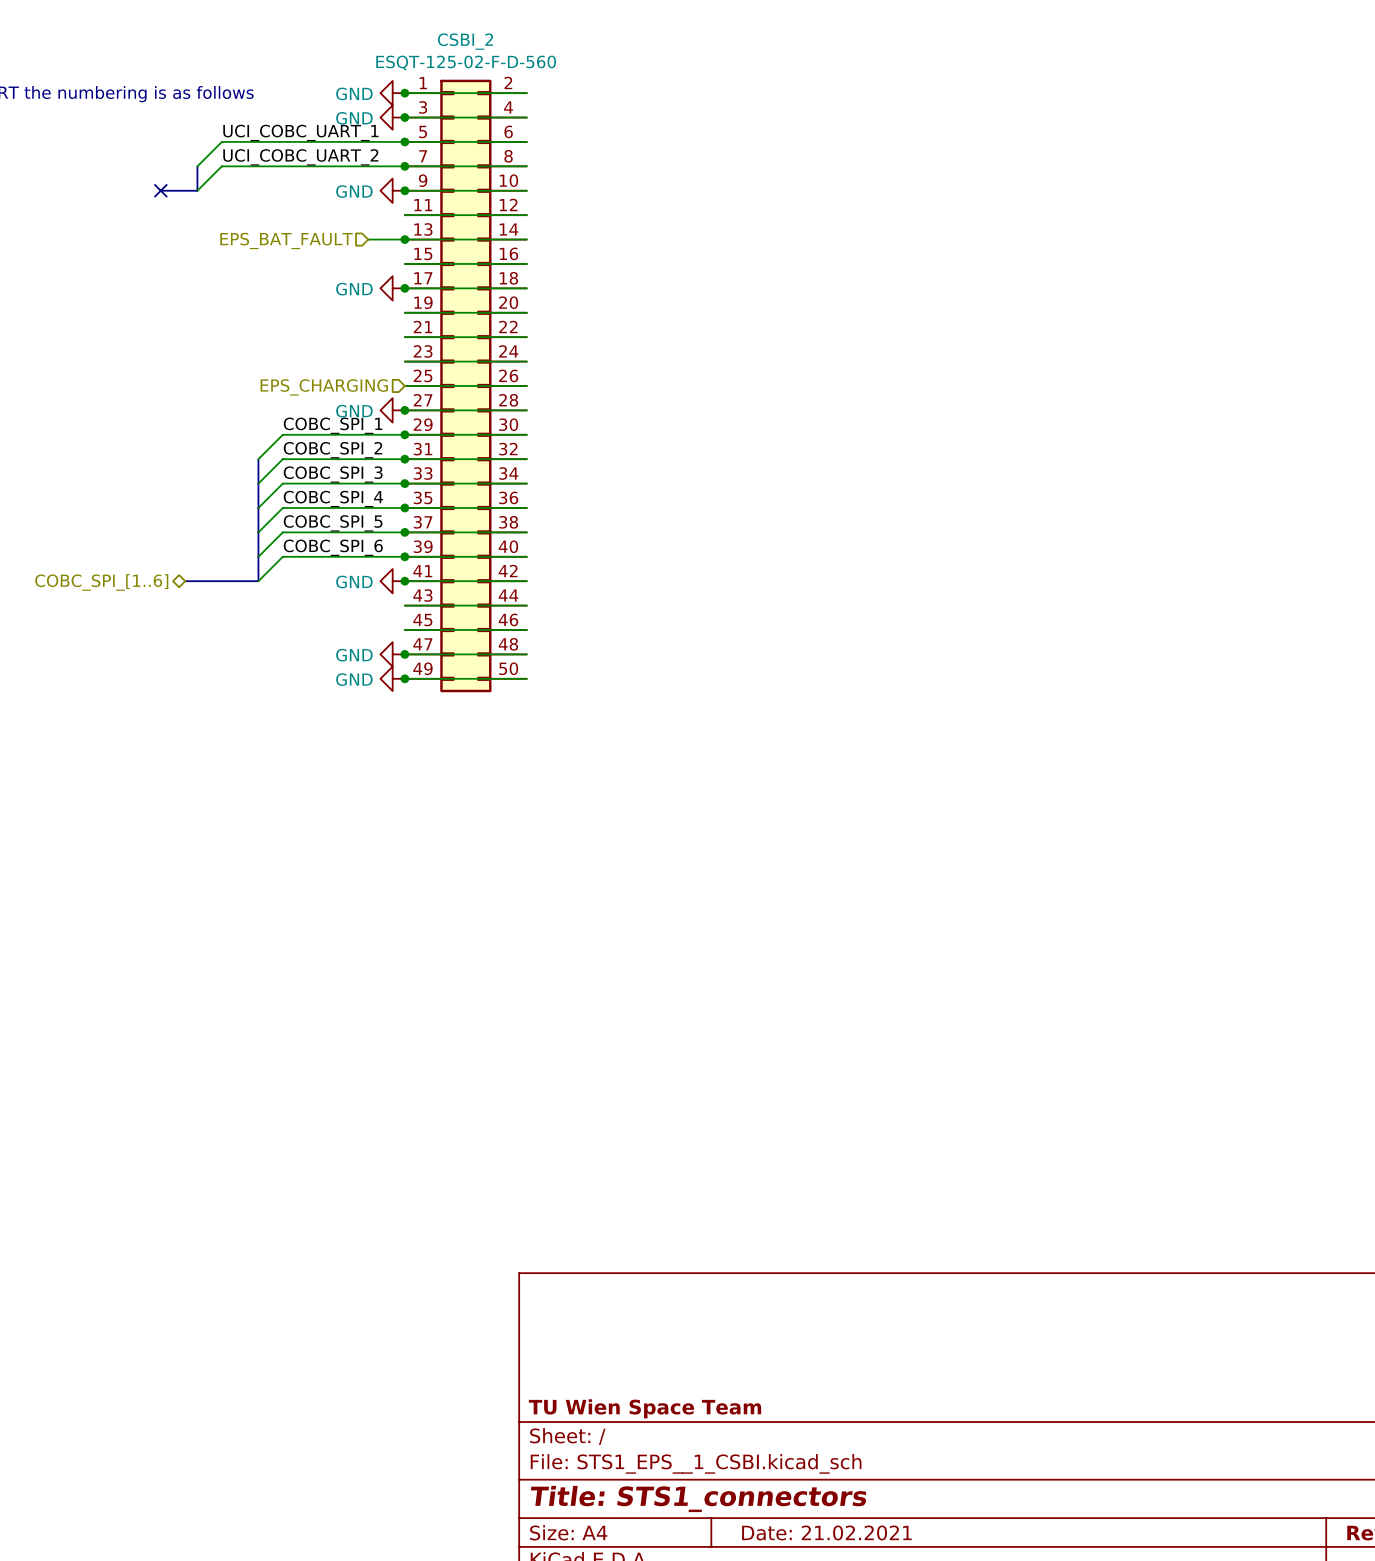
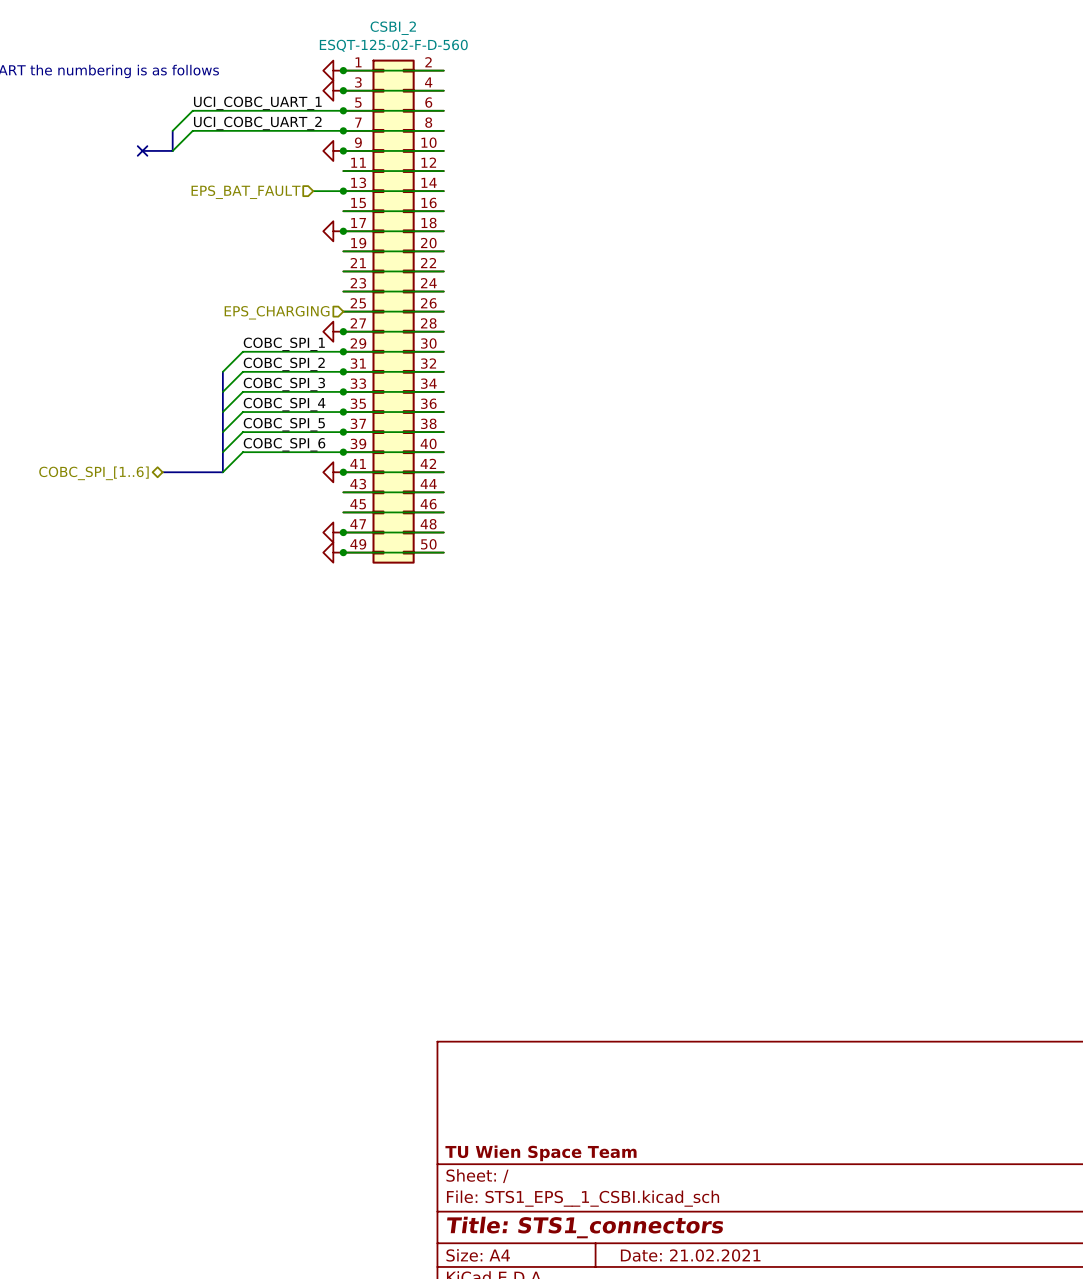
power symbol text: GND (354, 93) -> none
power symbol text: GND (354, 118) -> none
power symbol text: GND (354, 191) -> none
power symbol text: GND (354, 289) -> none
power symbol text: GND (354, 411) -> none
power symbol text: GND (354, 581) -> none
power symbol text: GND (354, 655) -> none
power symbol text: GND (354, 679) -> none

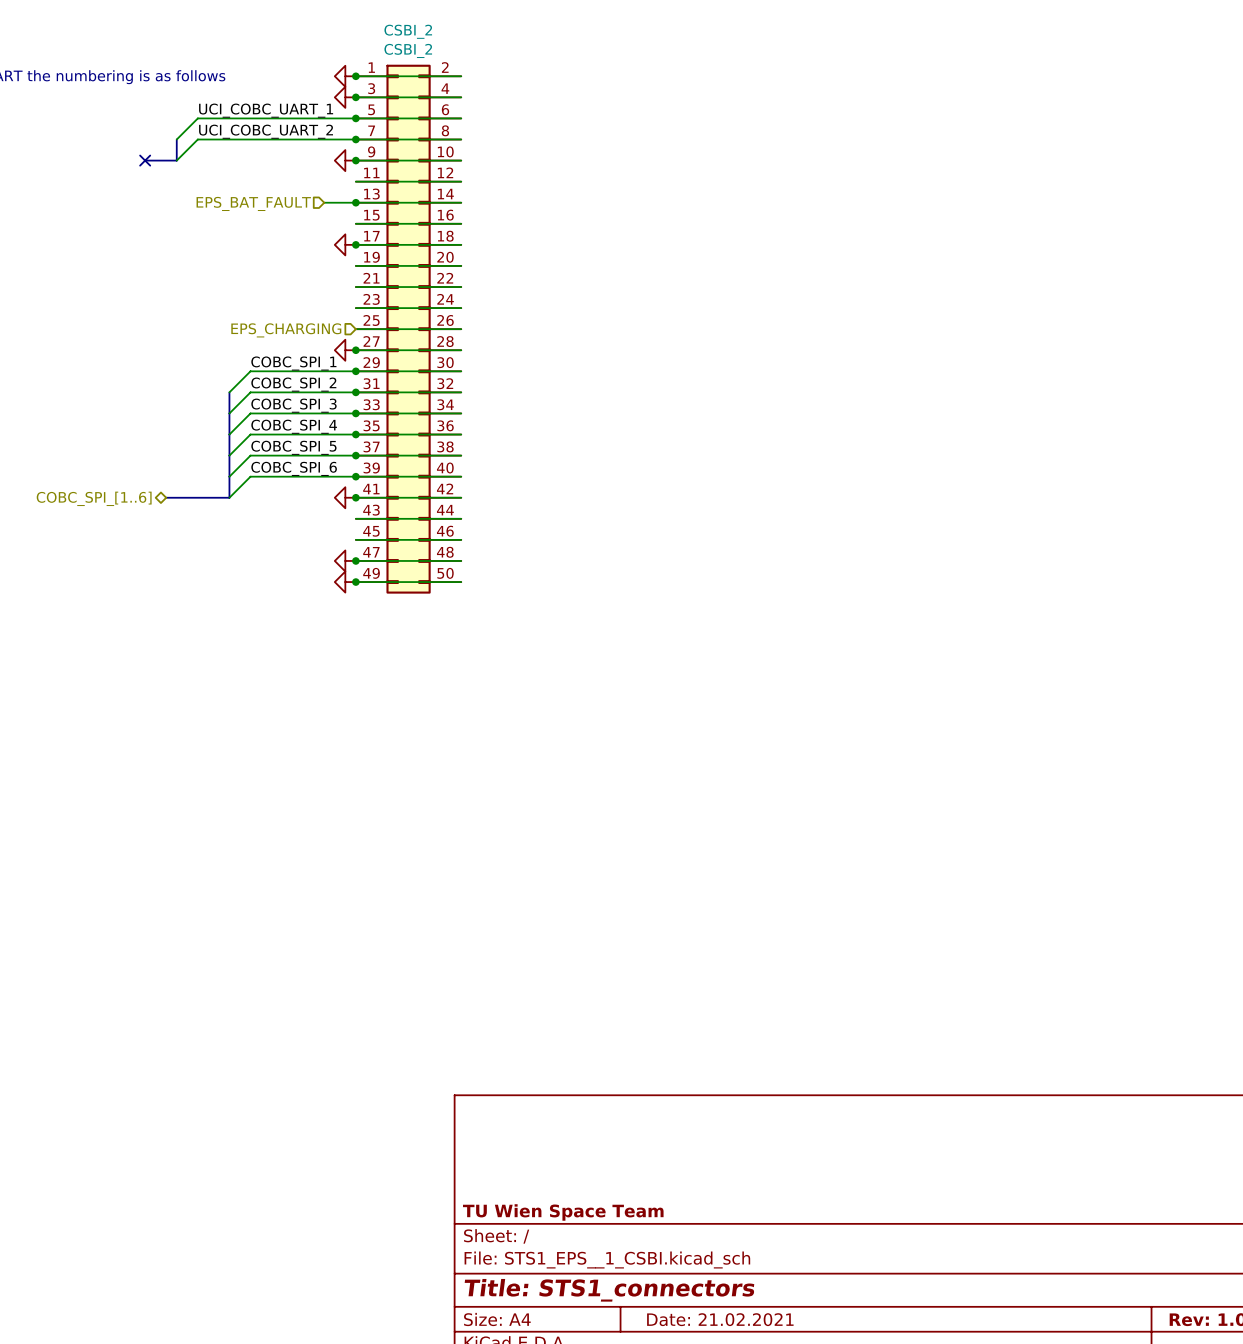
CSBI_2 value: ESQT-125-02-F-D-560 (393, 45) -> CSBI_2 (408, 50)

